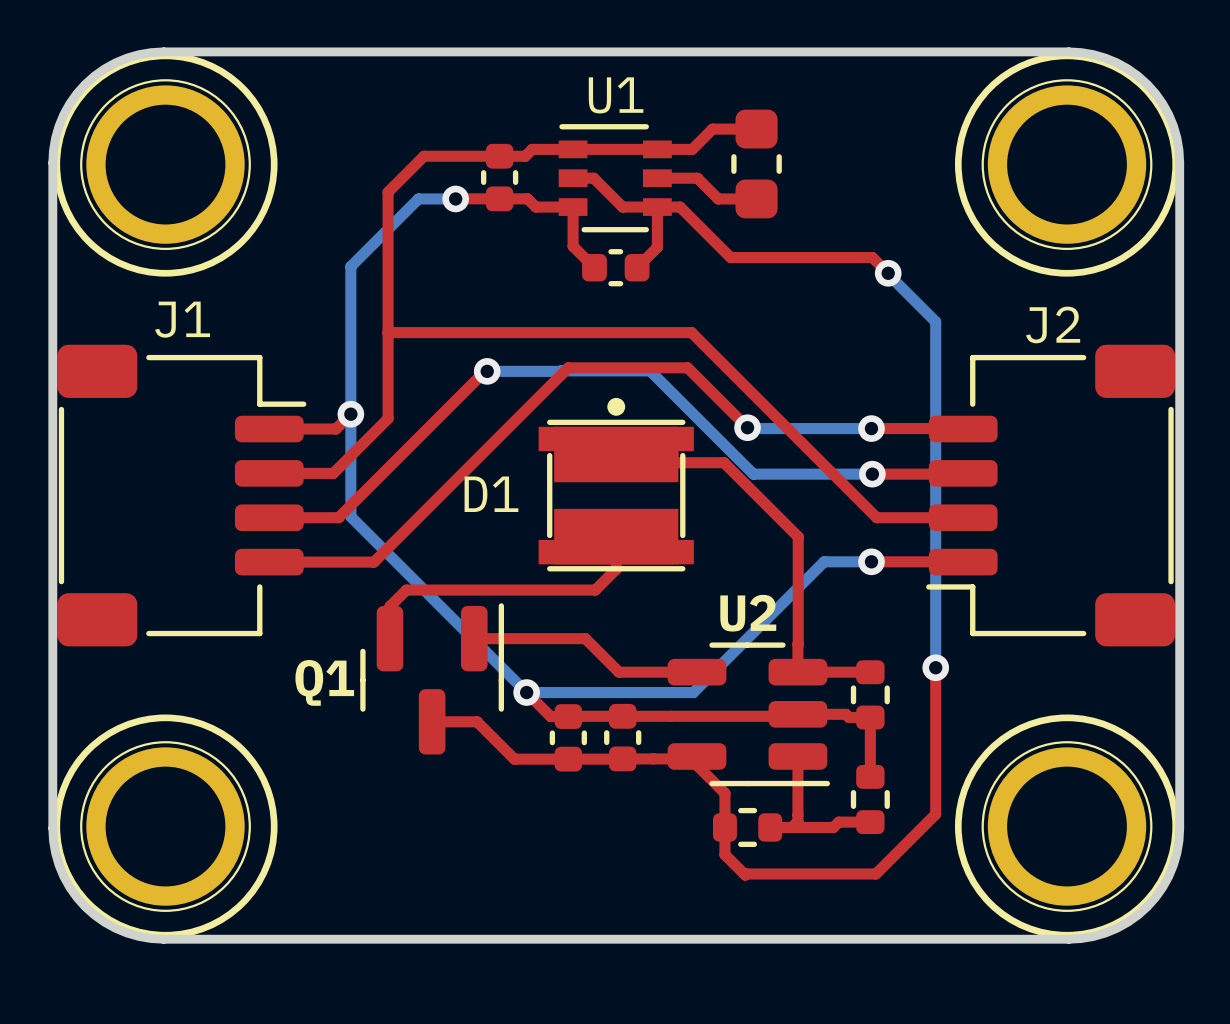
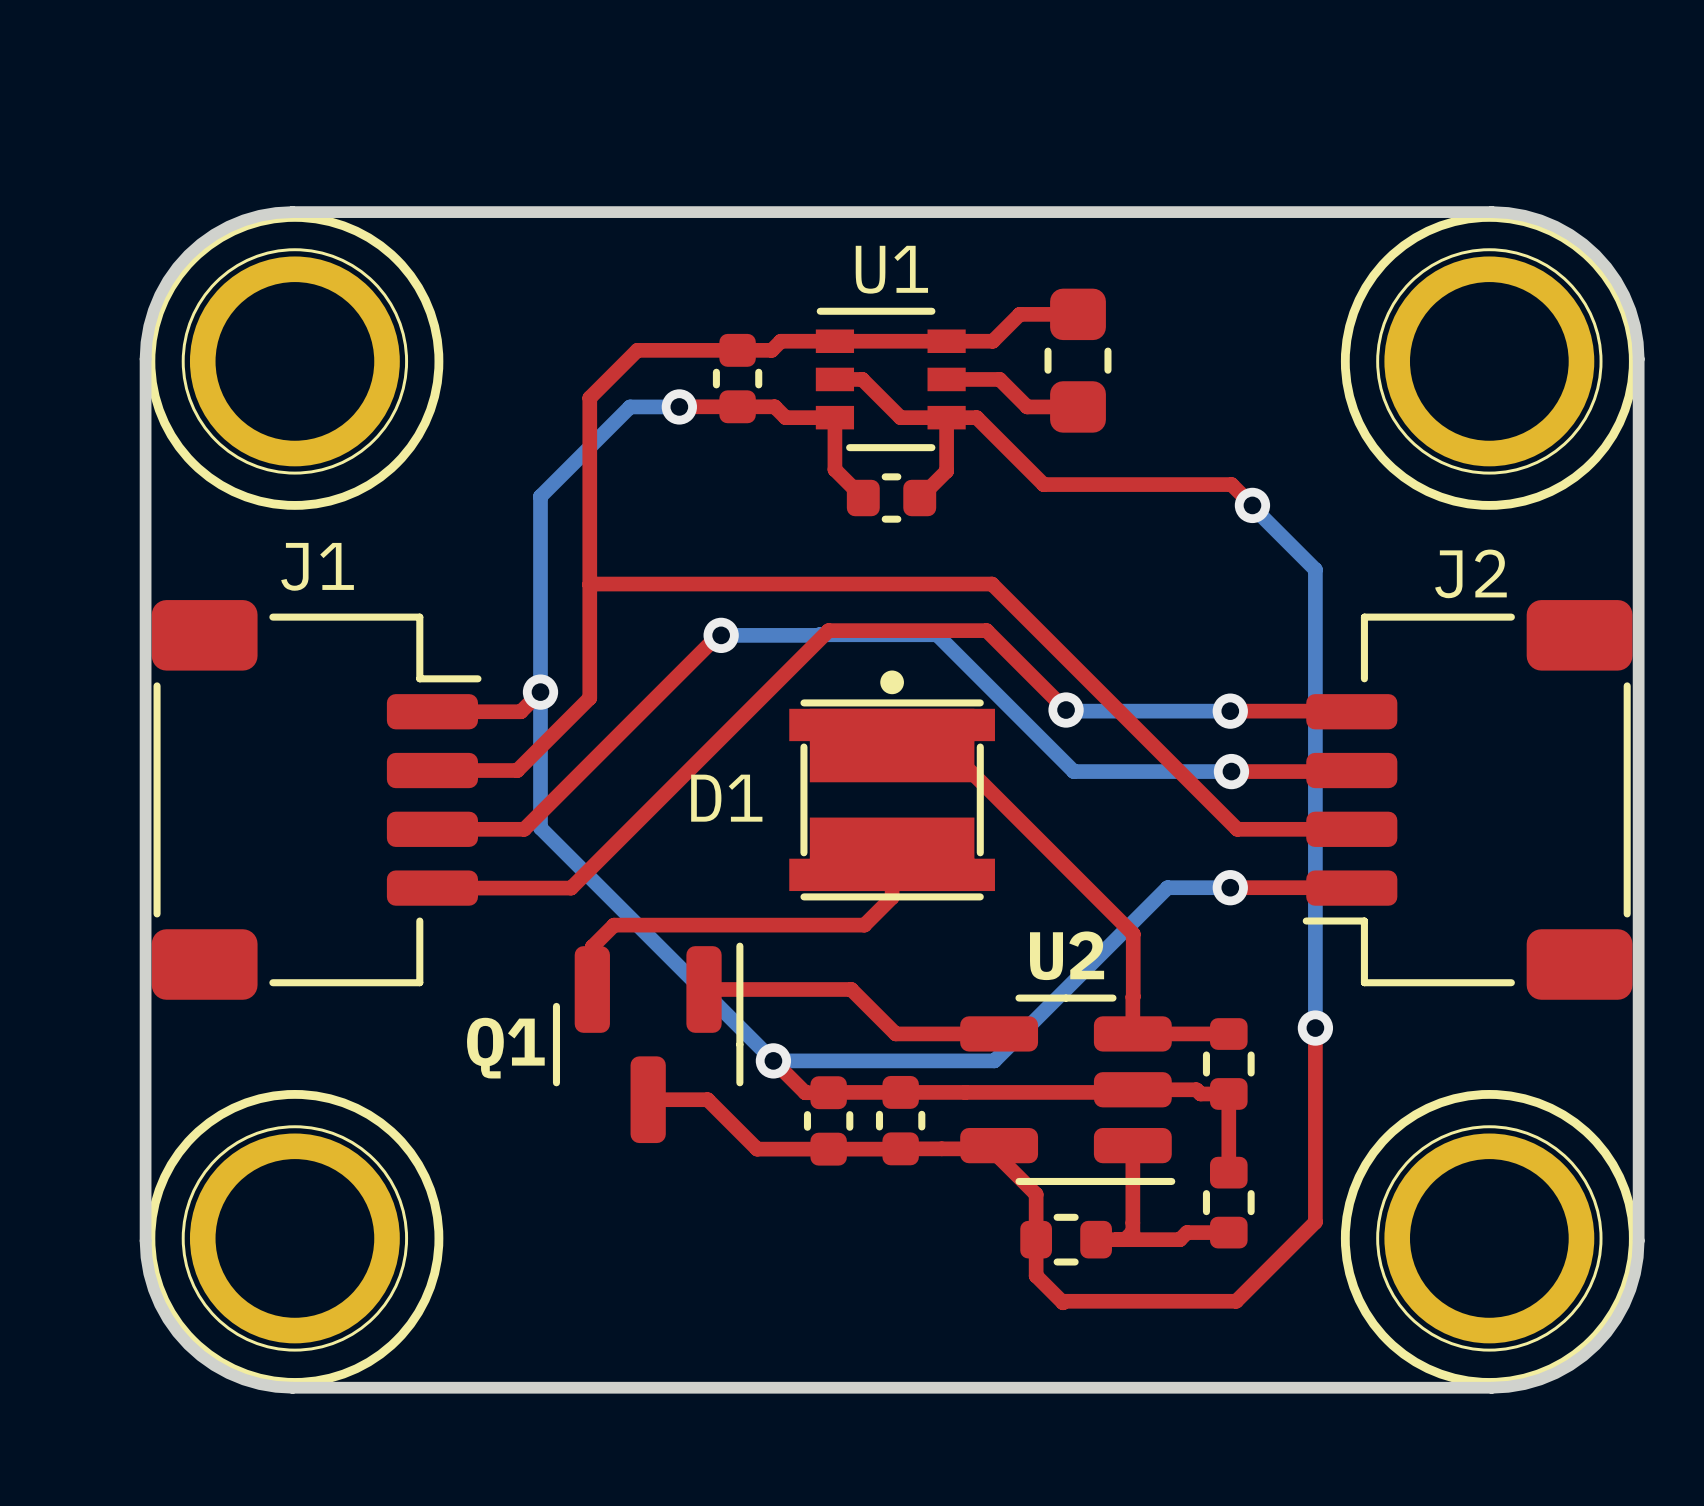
top track: (666, 454) (674, 462) (724, 462) (798, 536) (798, 596) -> (944, 745) (1133, 934)

